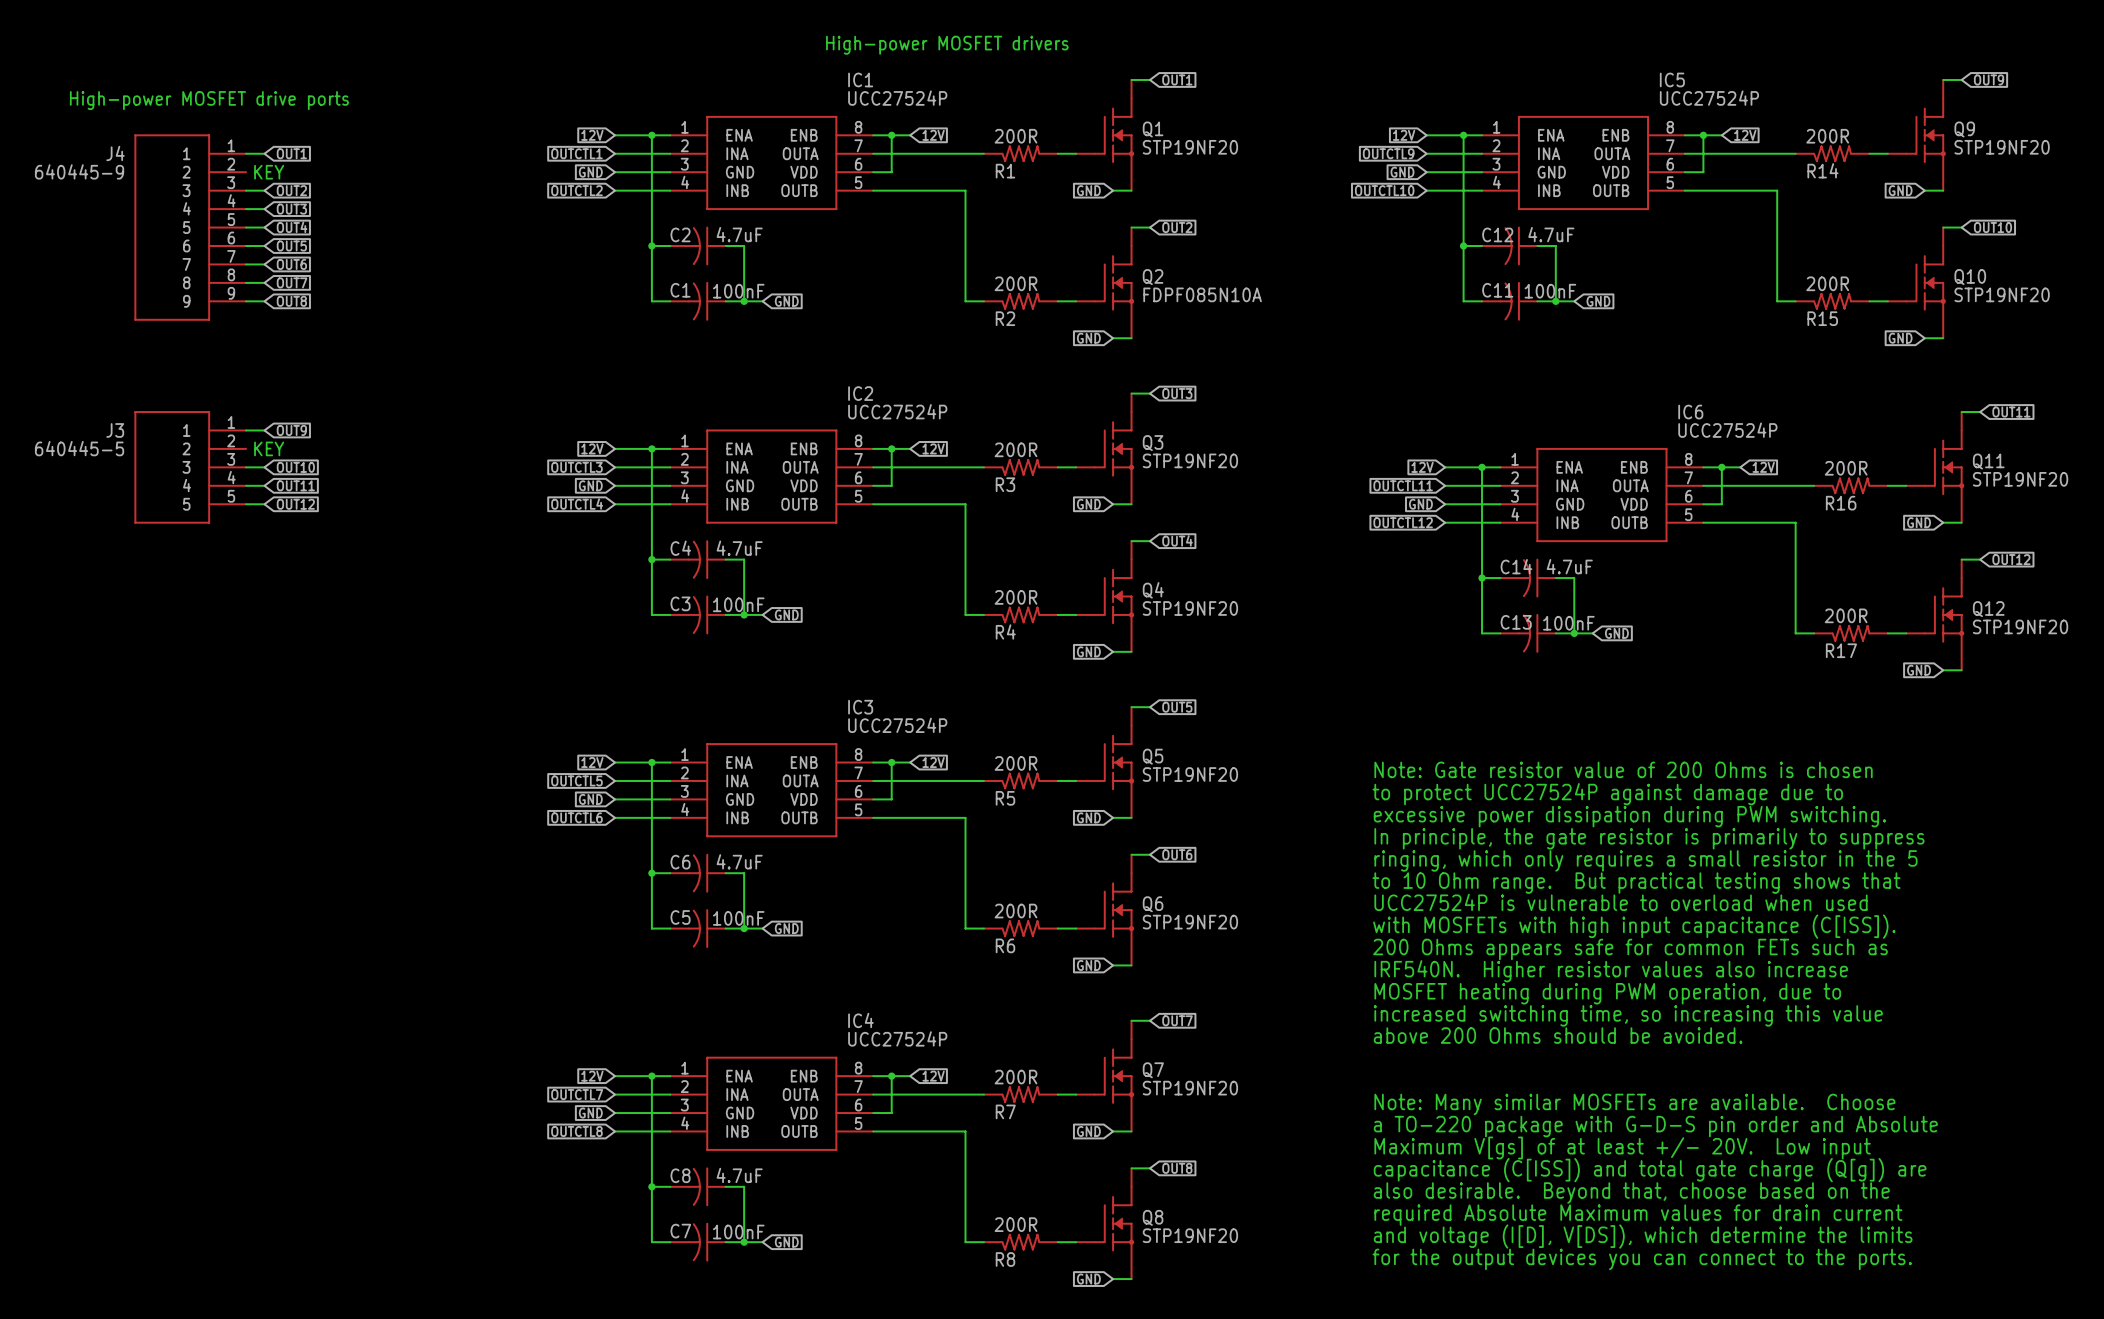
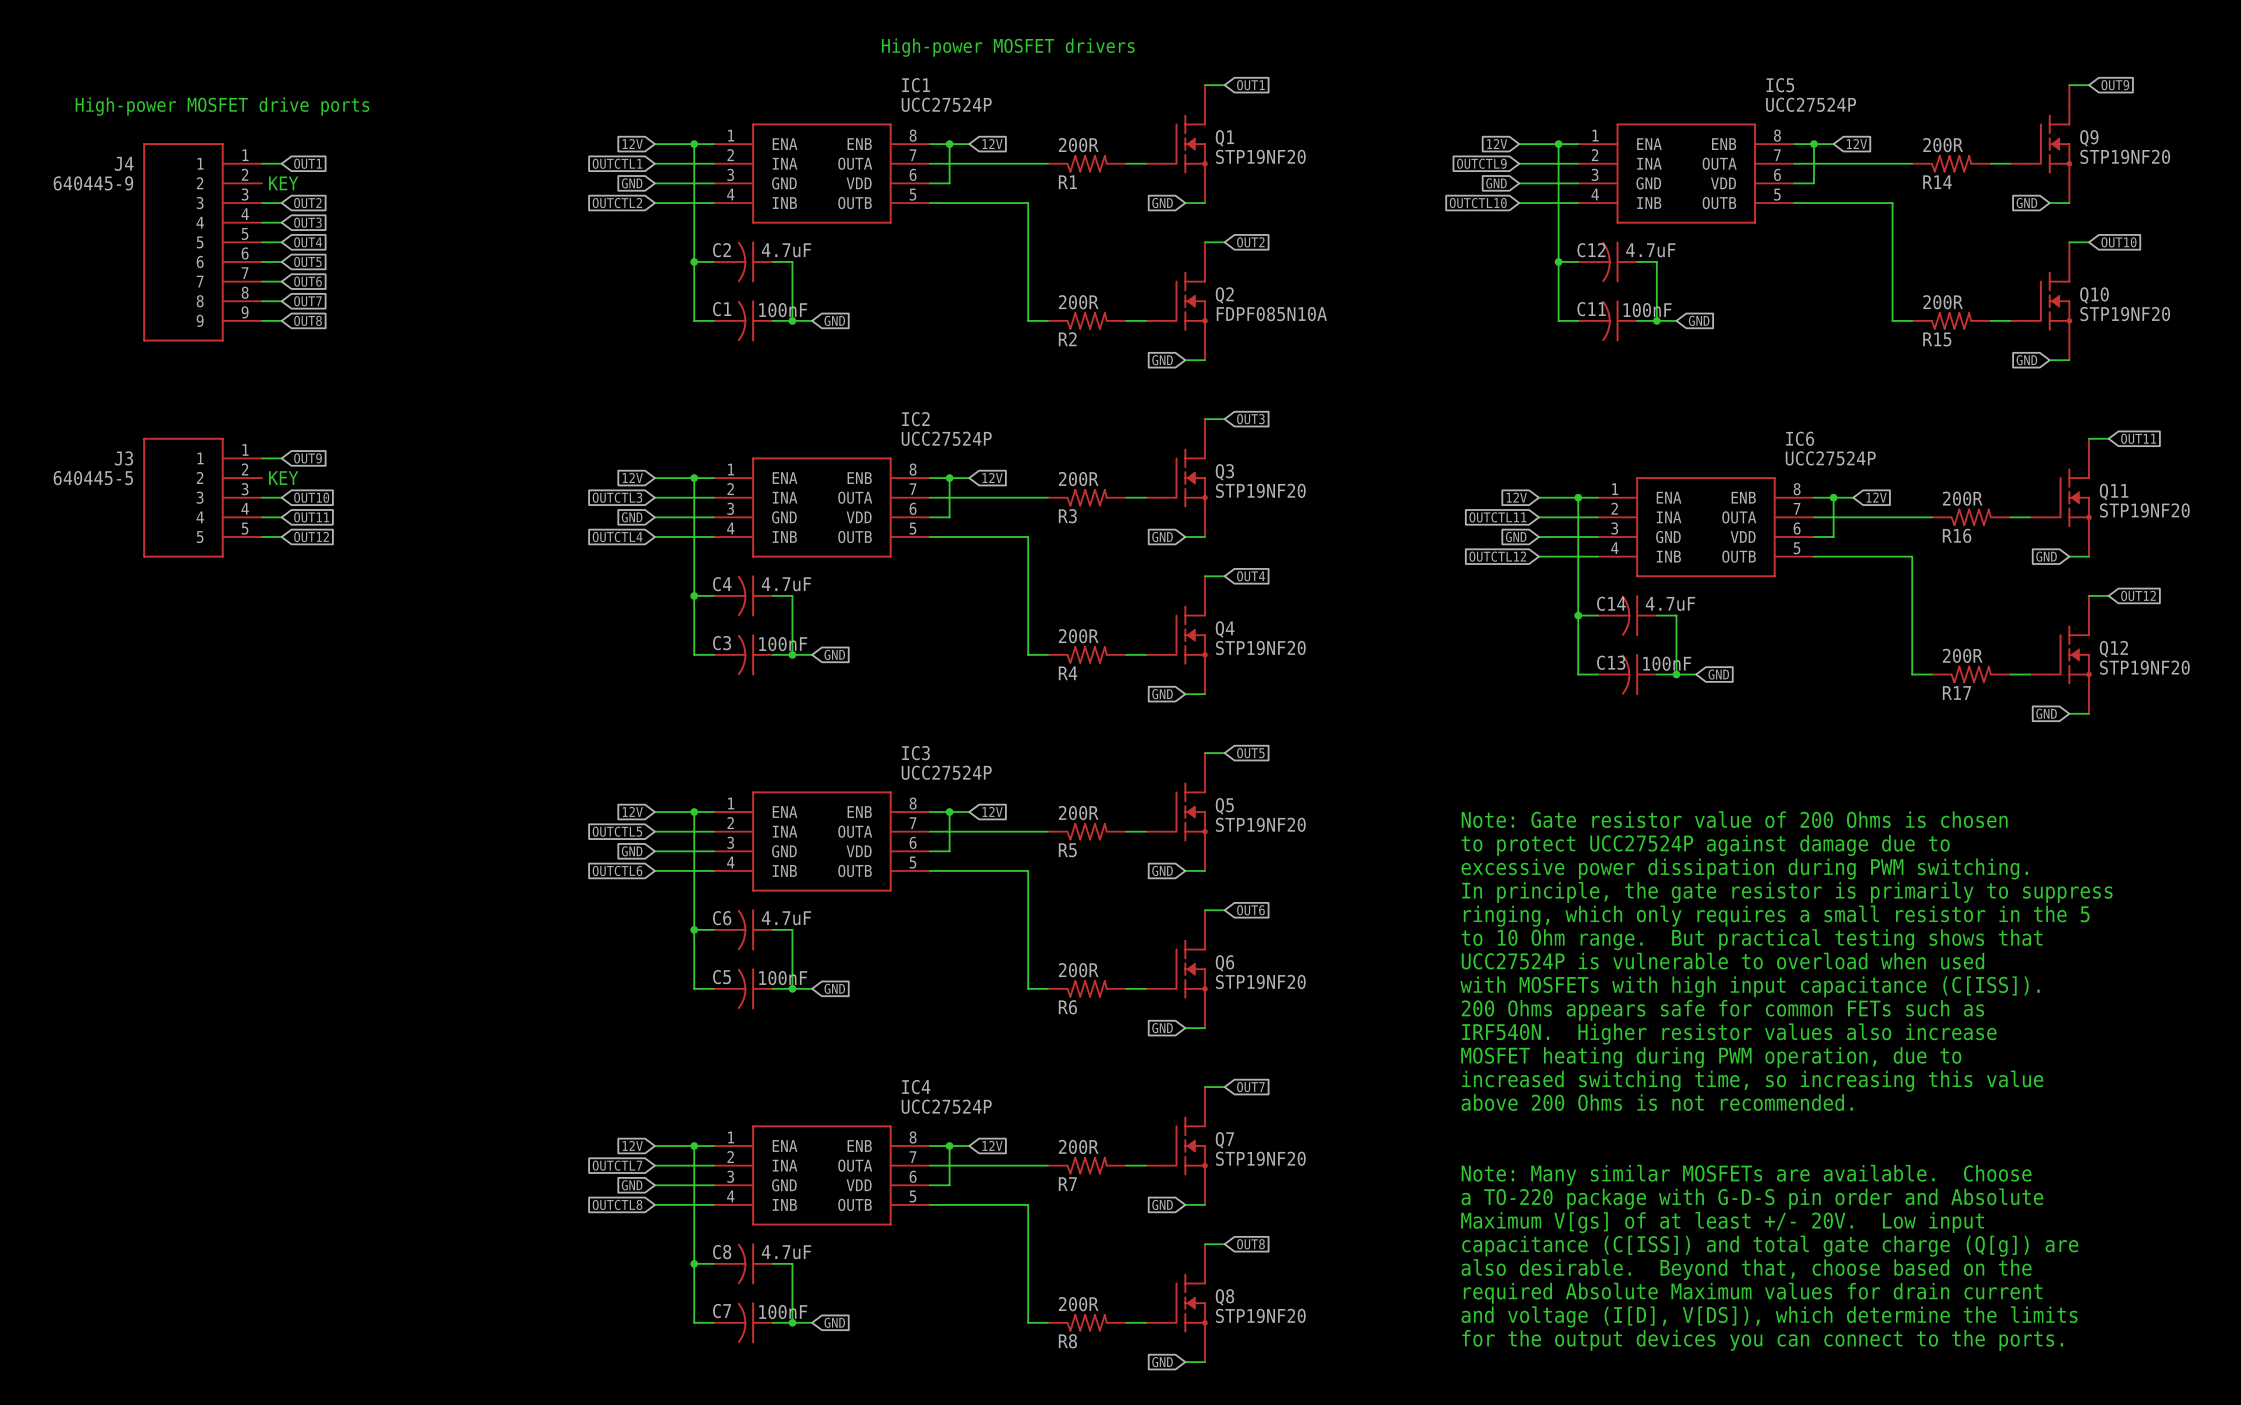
text: above 200 Ohms should be avoided. (1558, 1035) -> above 200 Ohms is not recommended. (1657, 1102)

